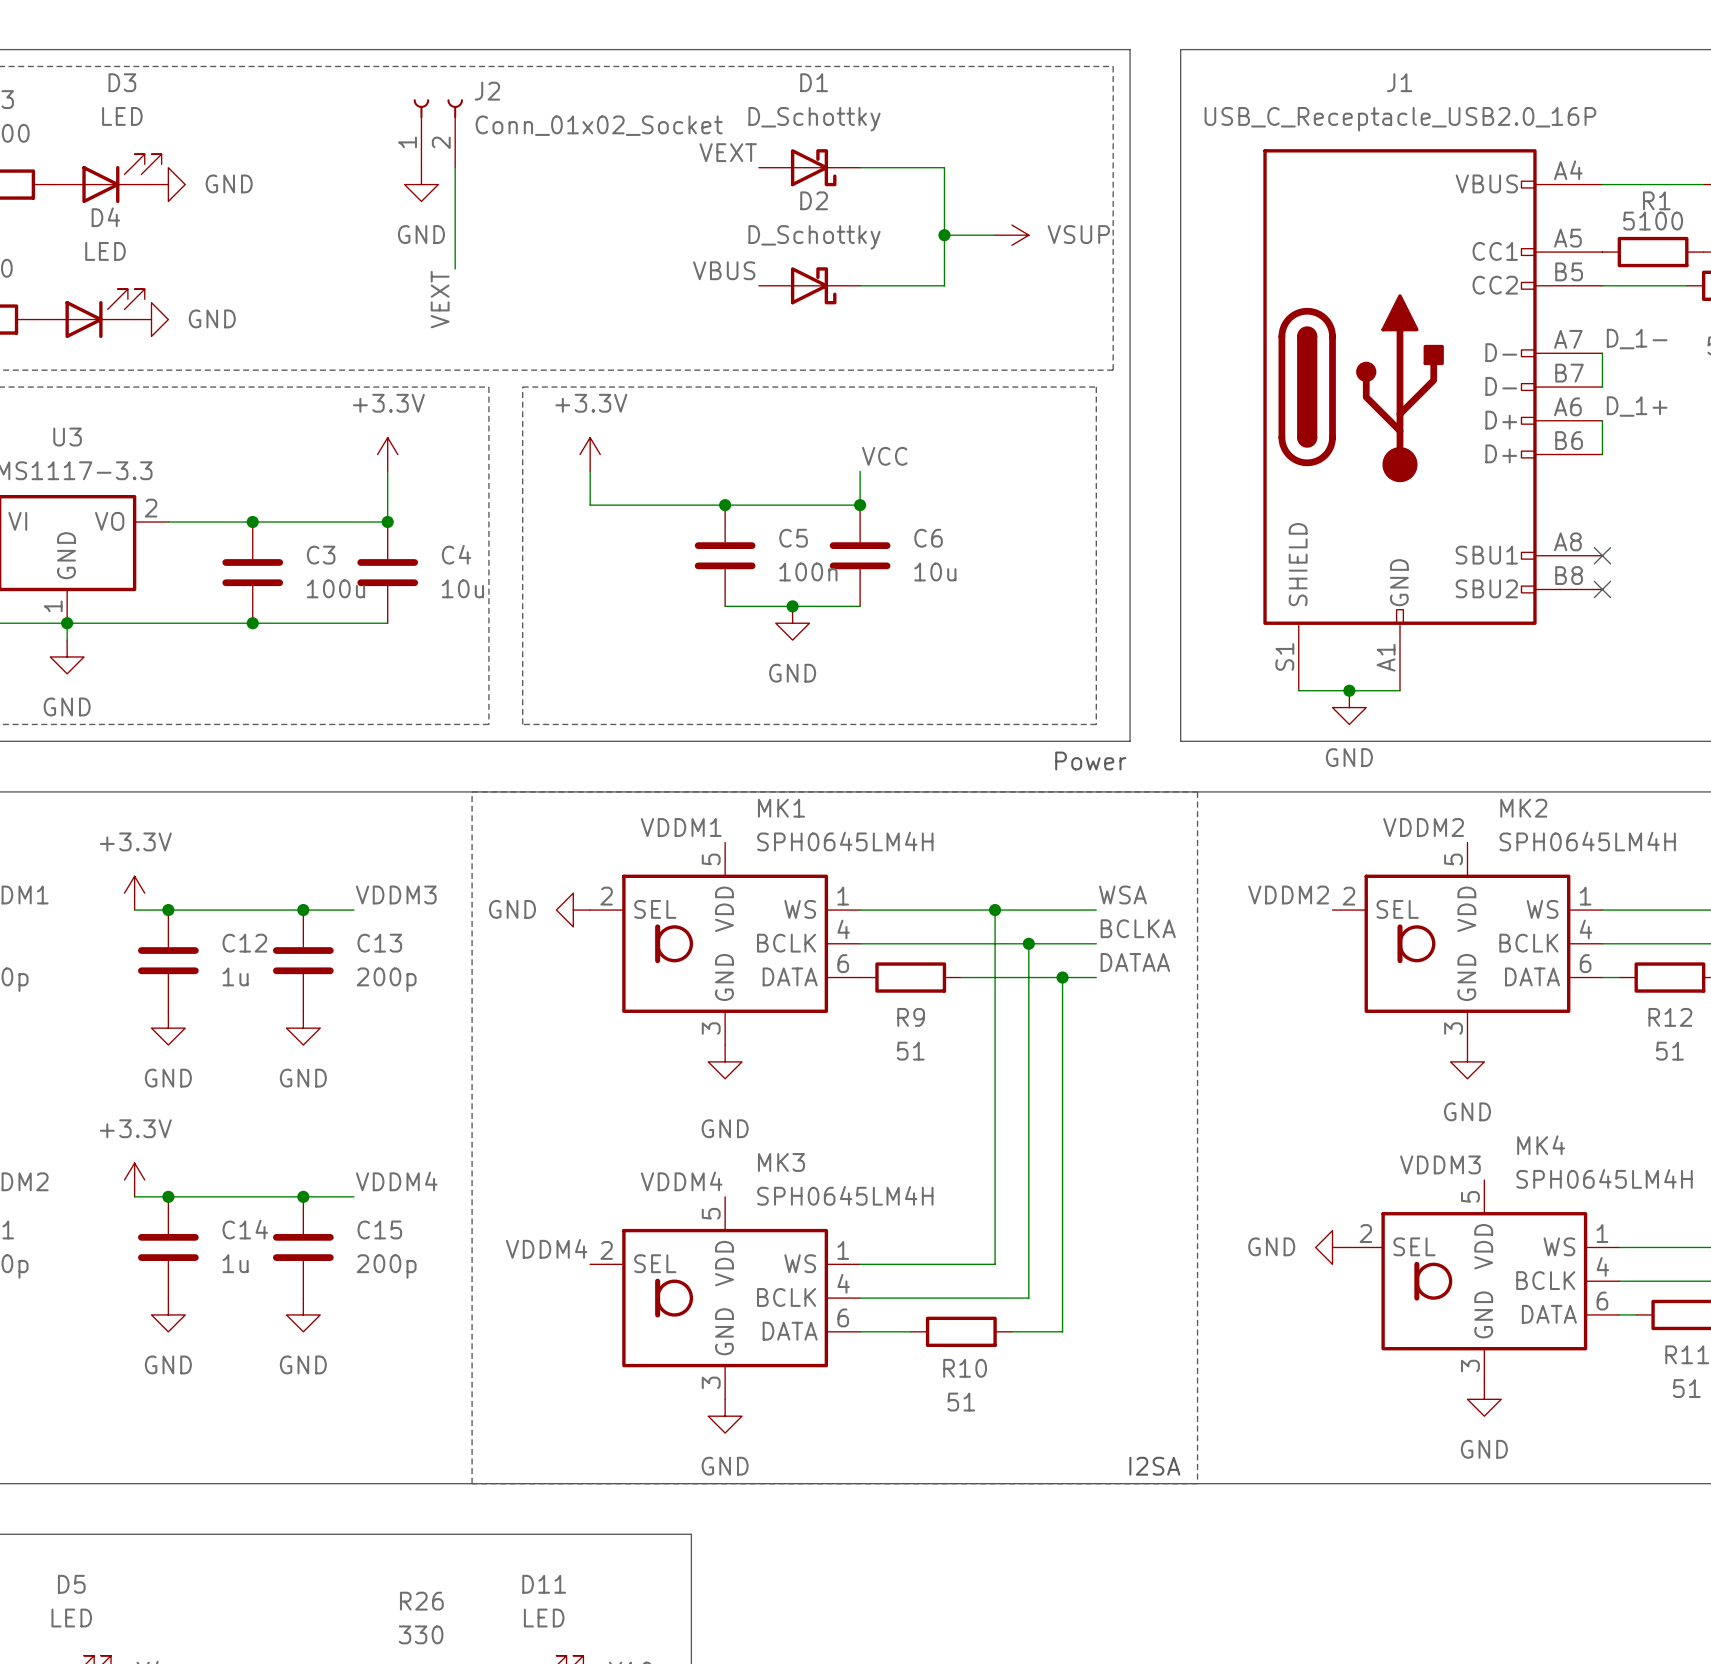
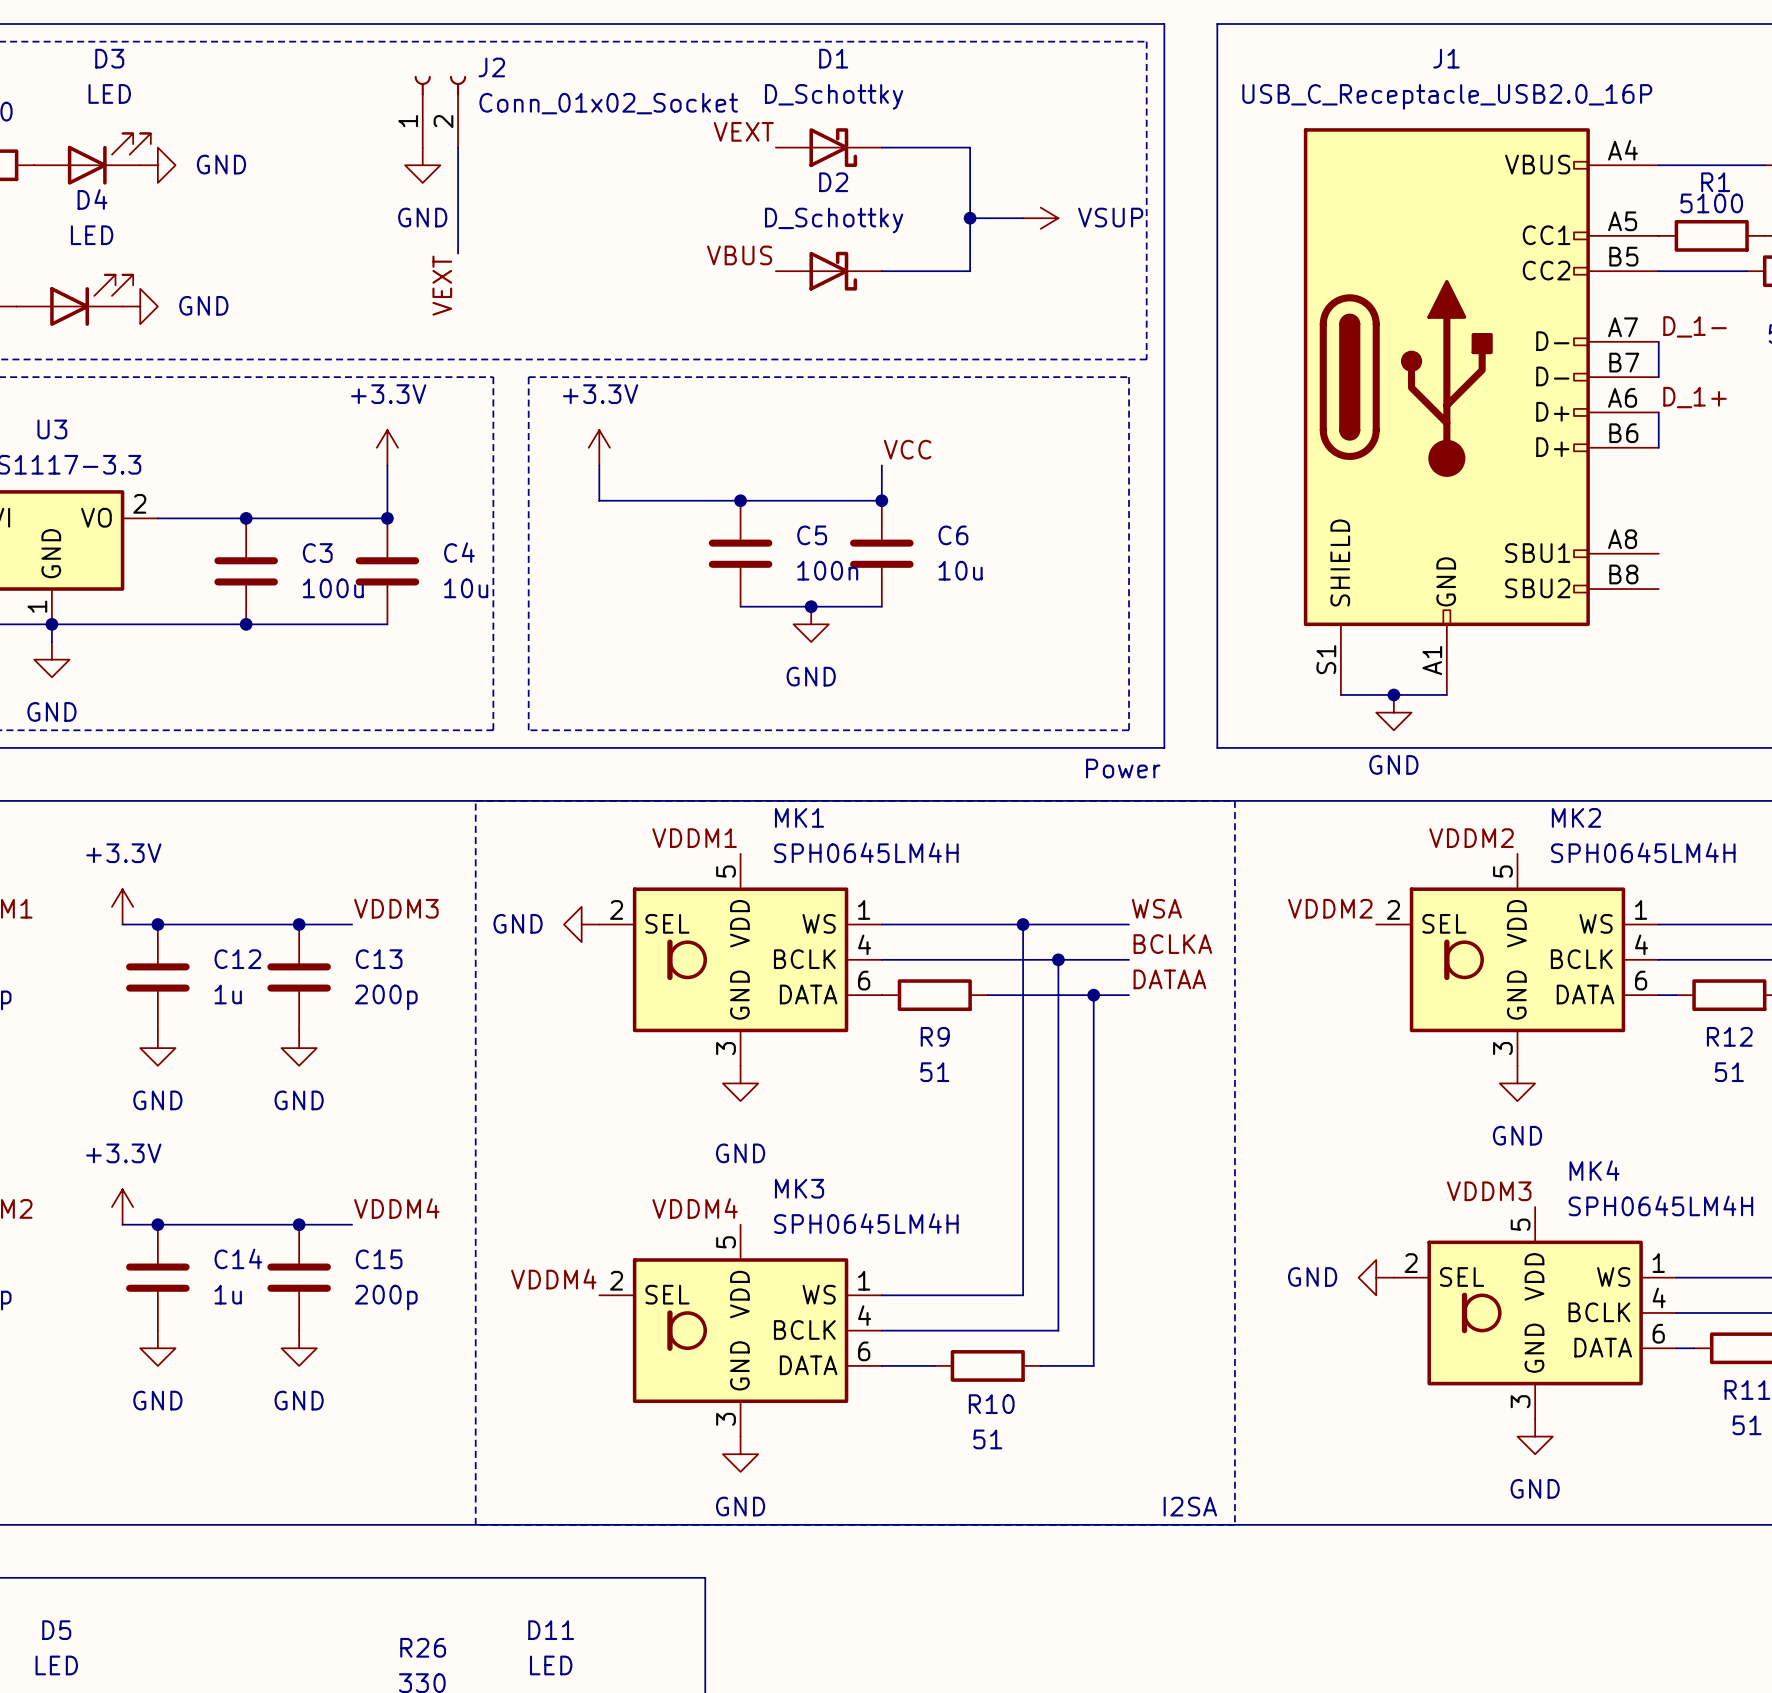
no-connect mark: (1602, 555) -> none
no-connect mark: (1602, 589) -> none

